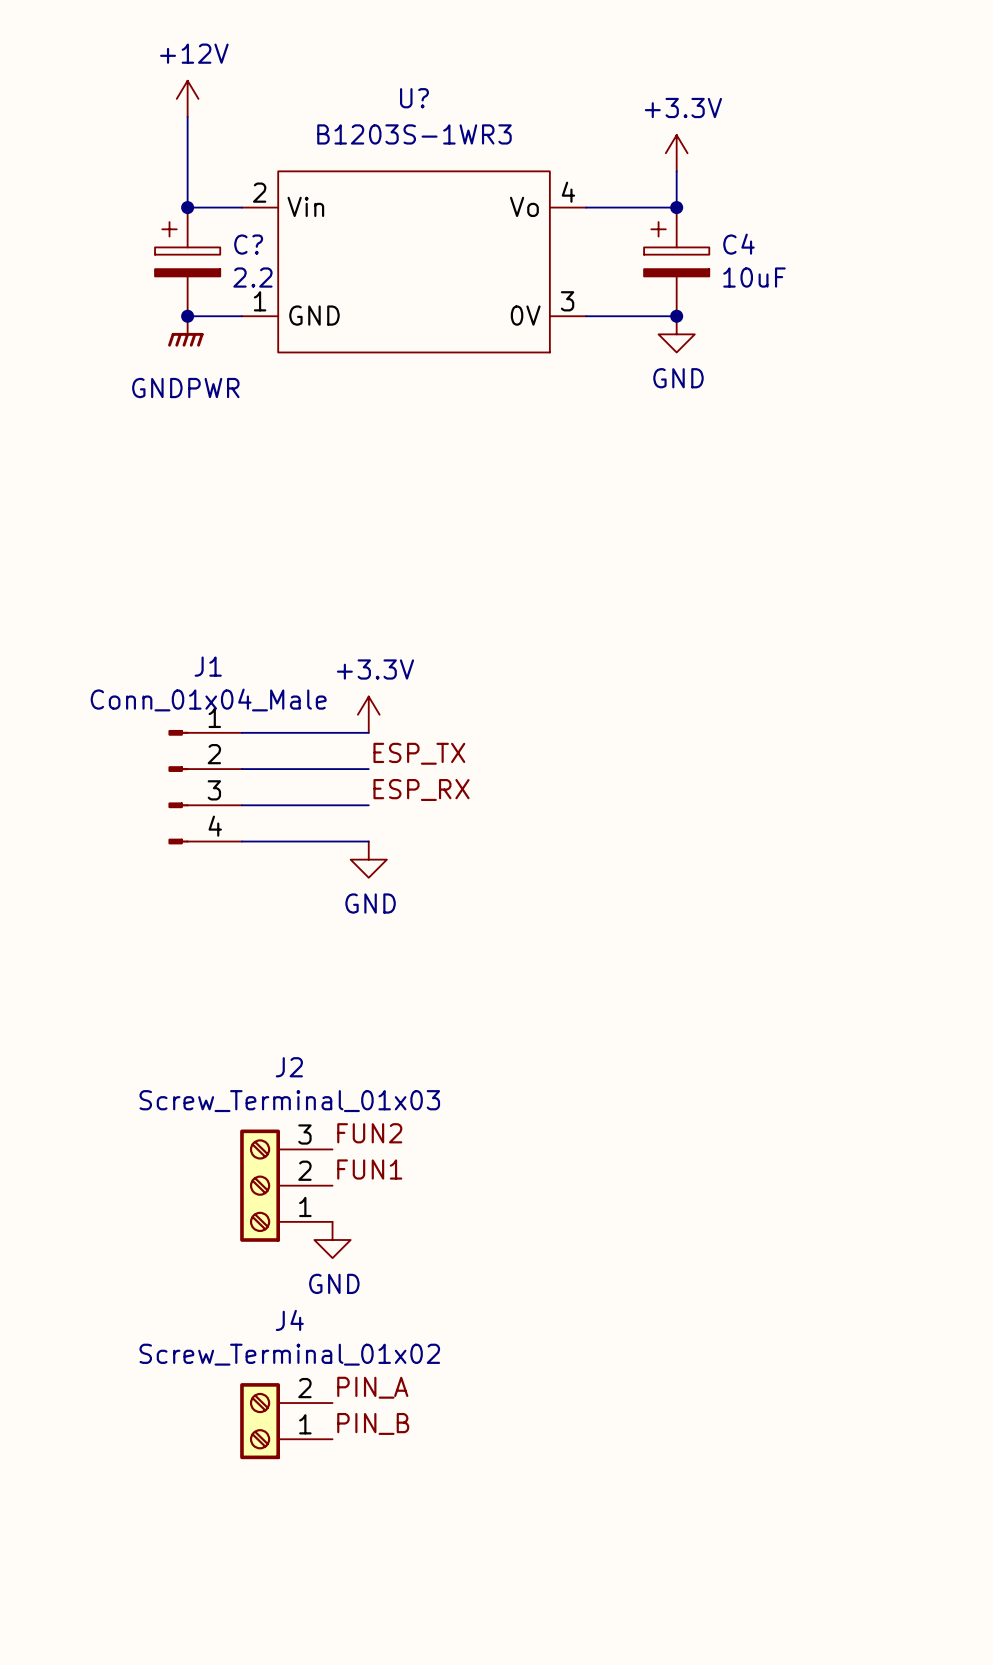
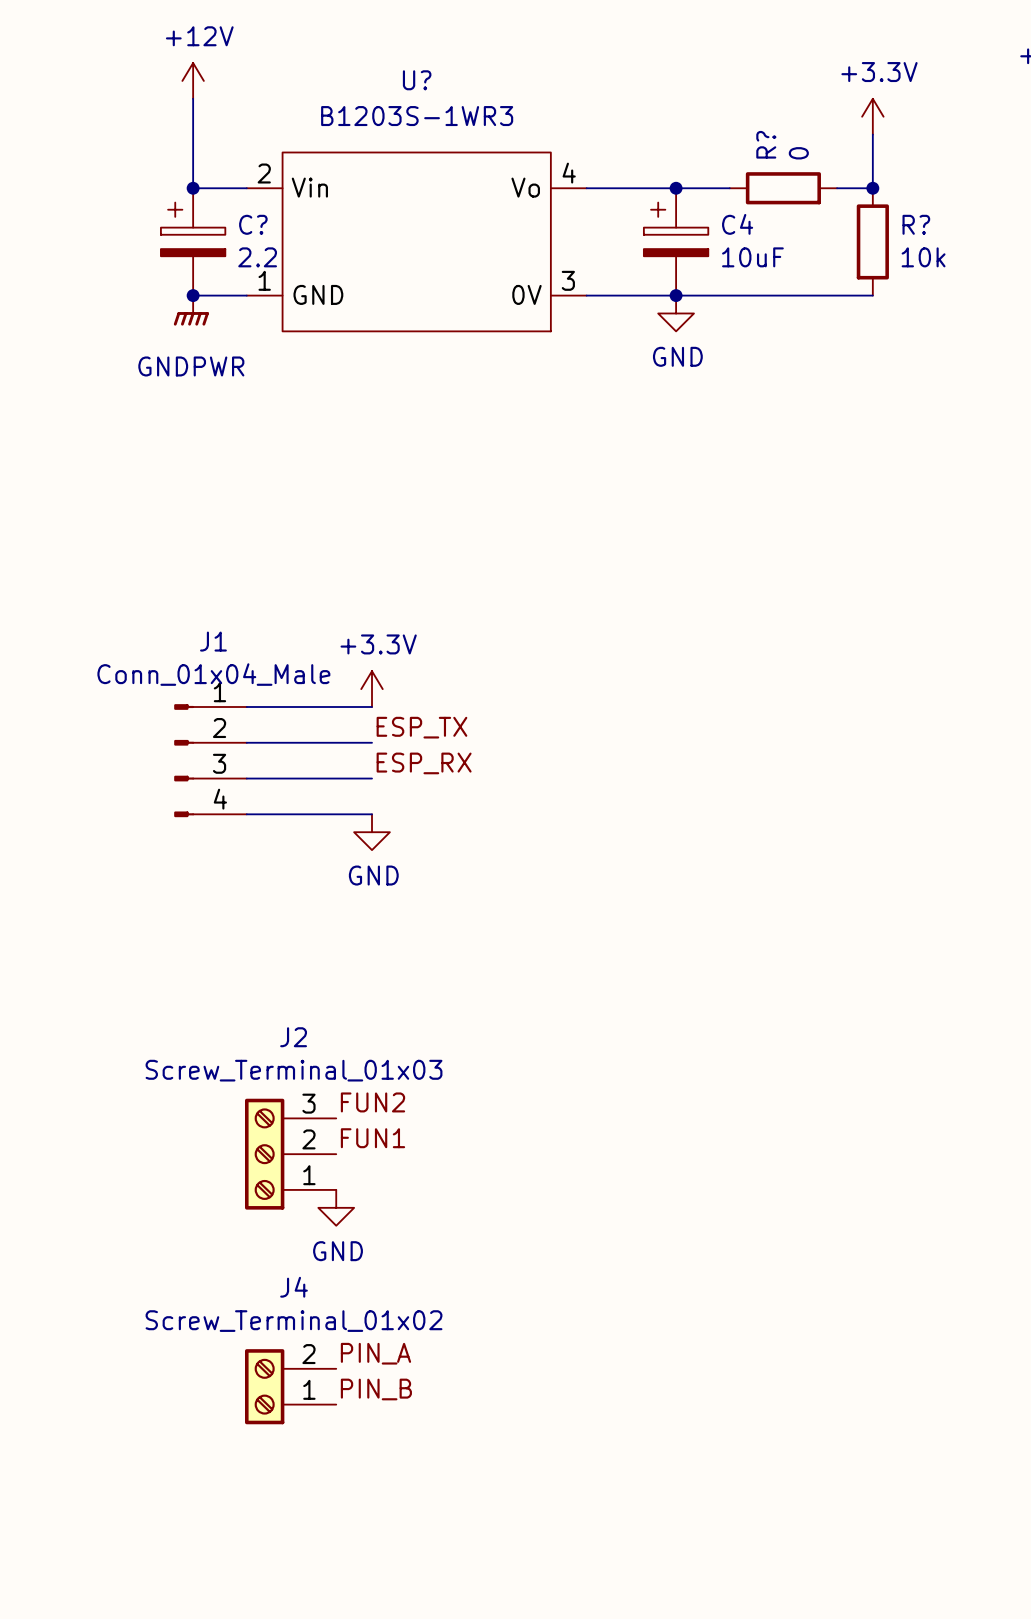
power symbol position: +3.3V (676, 153) -> +3.3V (872, 116)
wire: none -> (872, 134) (872, 188) (837, 188)
wire: (676, 171) (676, 207) -> (729, 188) (676, 188)
R?: none -> 0 (783, 188)
junction: none -> (872, 188)
R?: none -> 10k (872, 241)
wire: none -> (676, 295) (872, 295)

